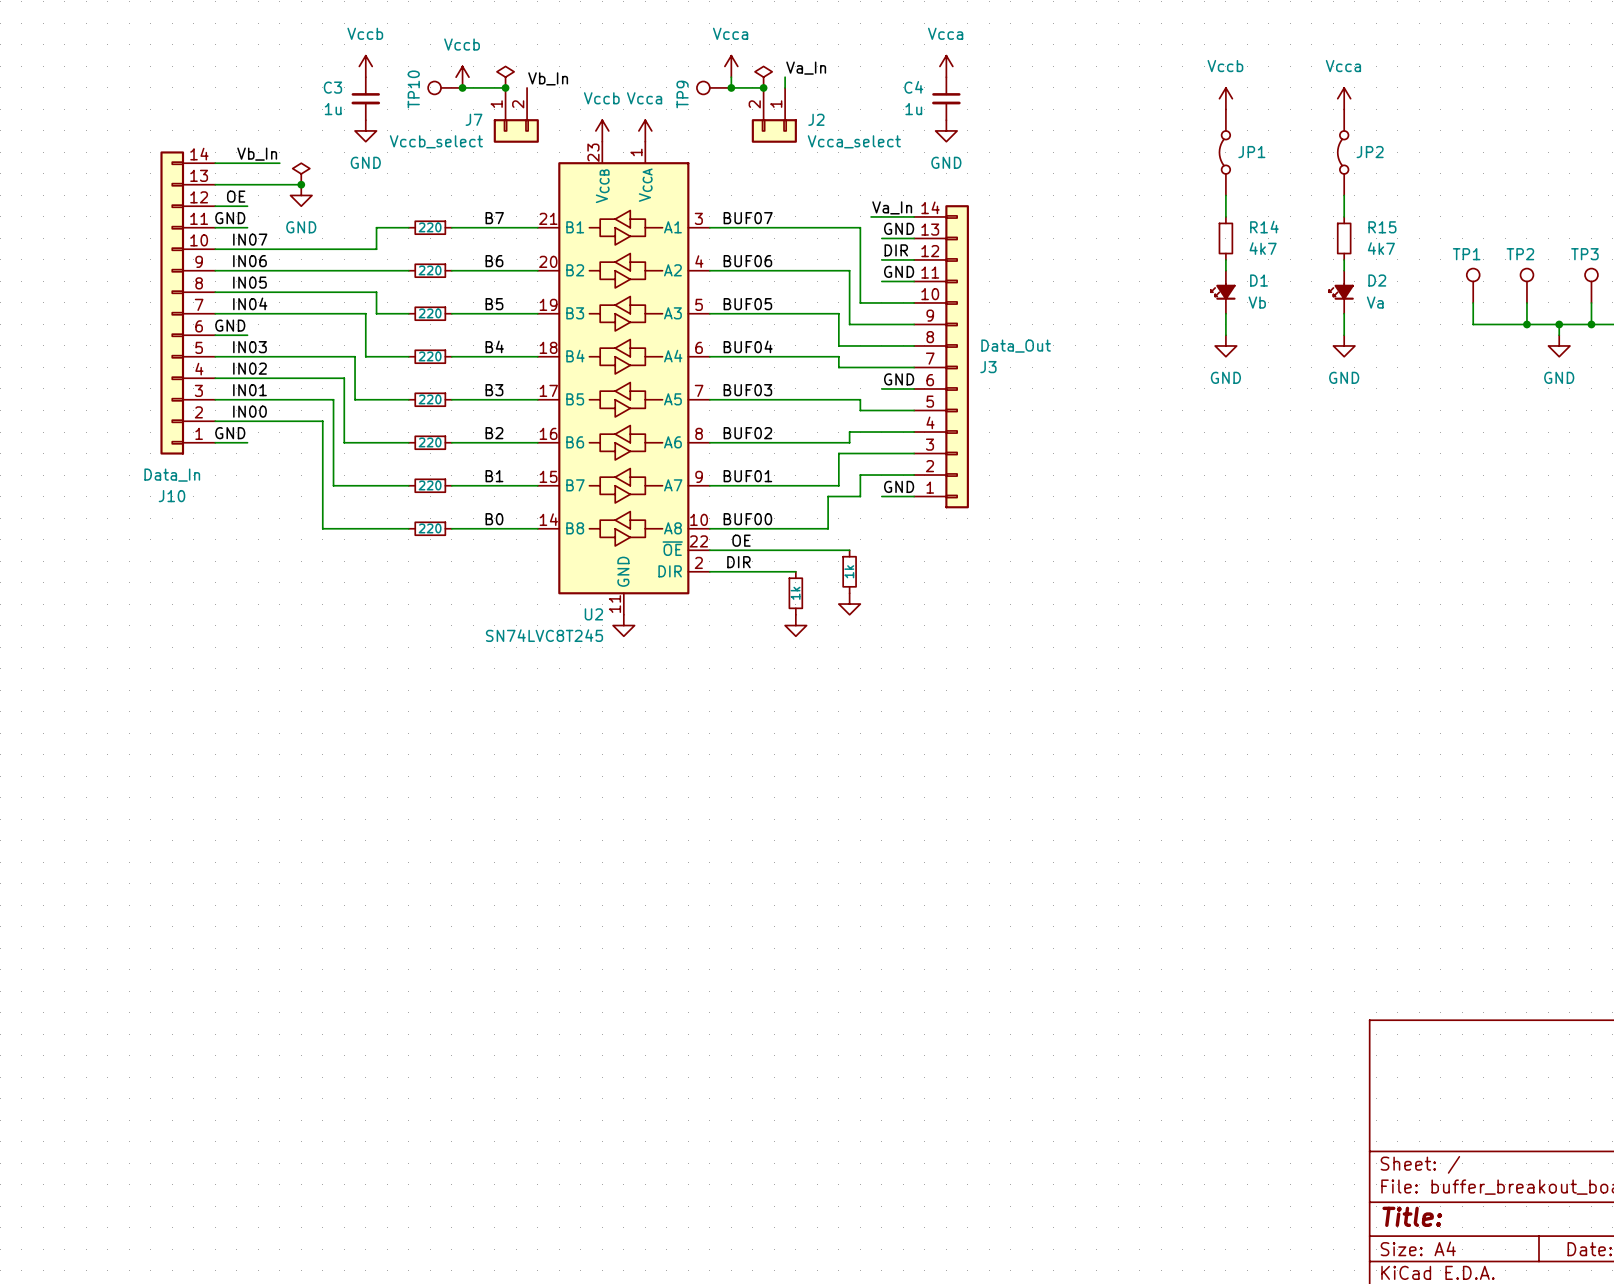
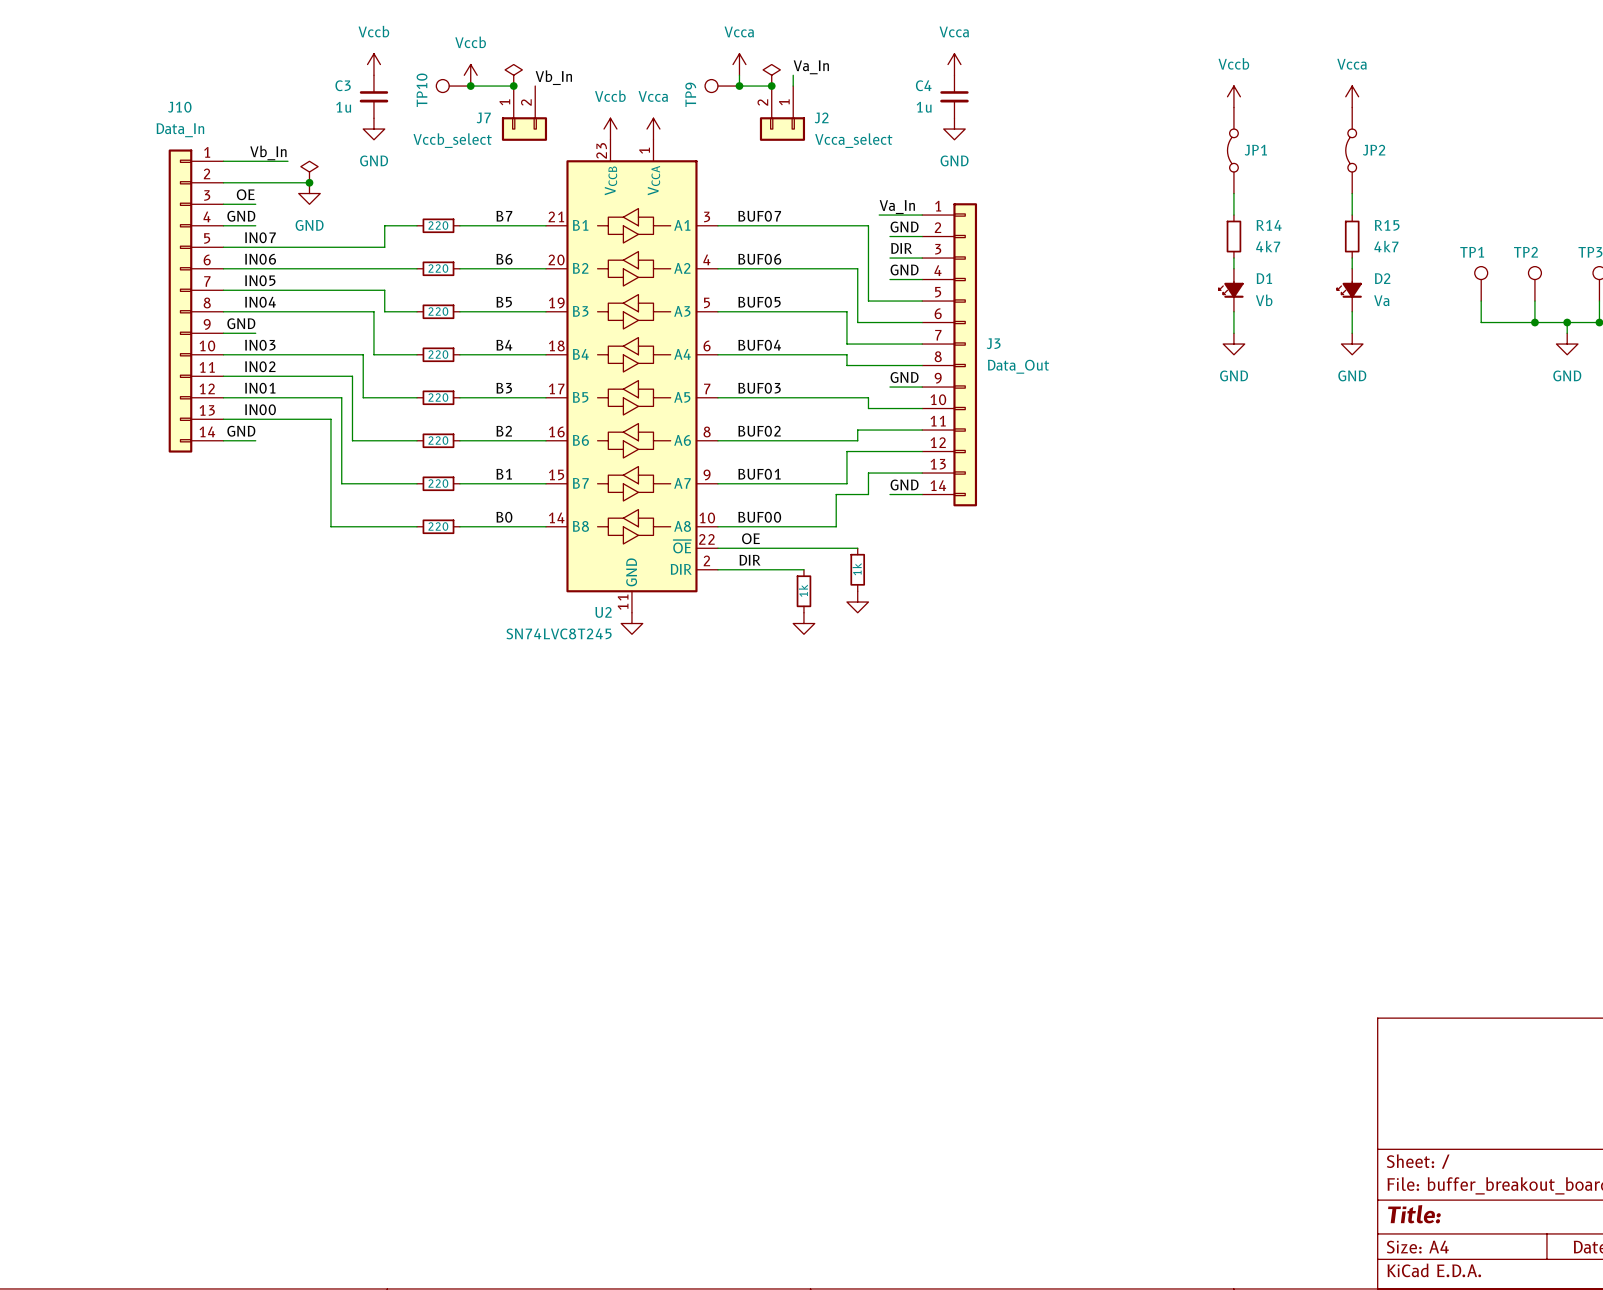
J10 flip: as is (172, 302) -> up-down (180, 301)
J3 flip: as is (957, 356) -> up-down (965, 354)

